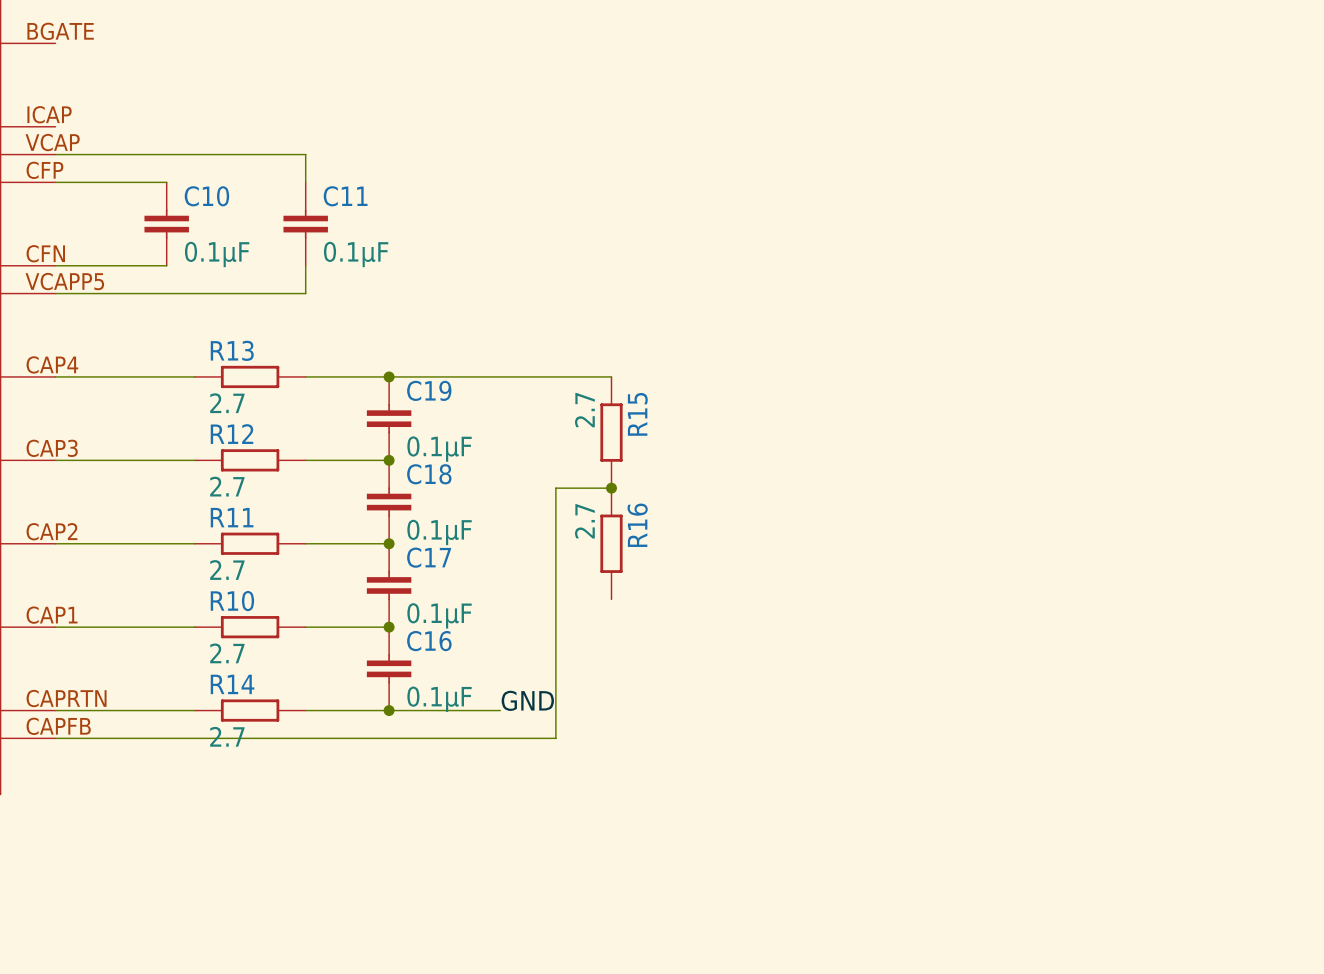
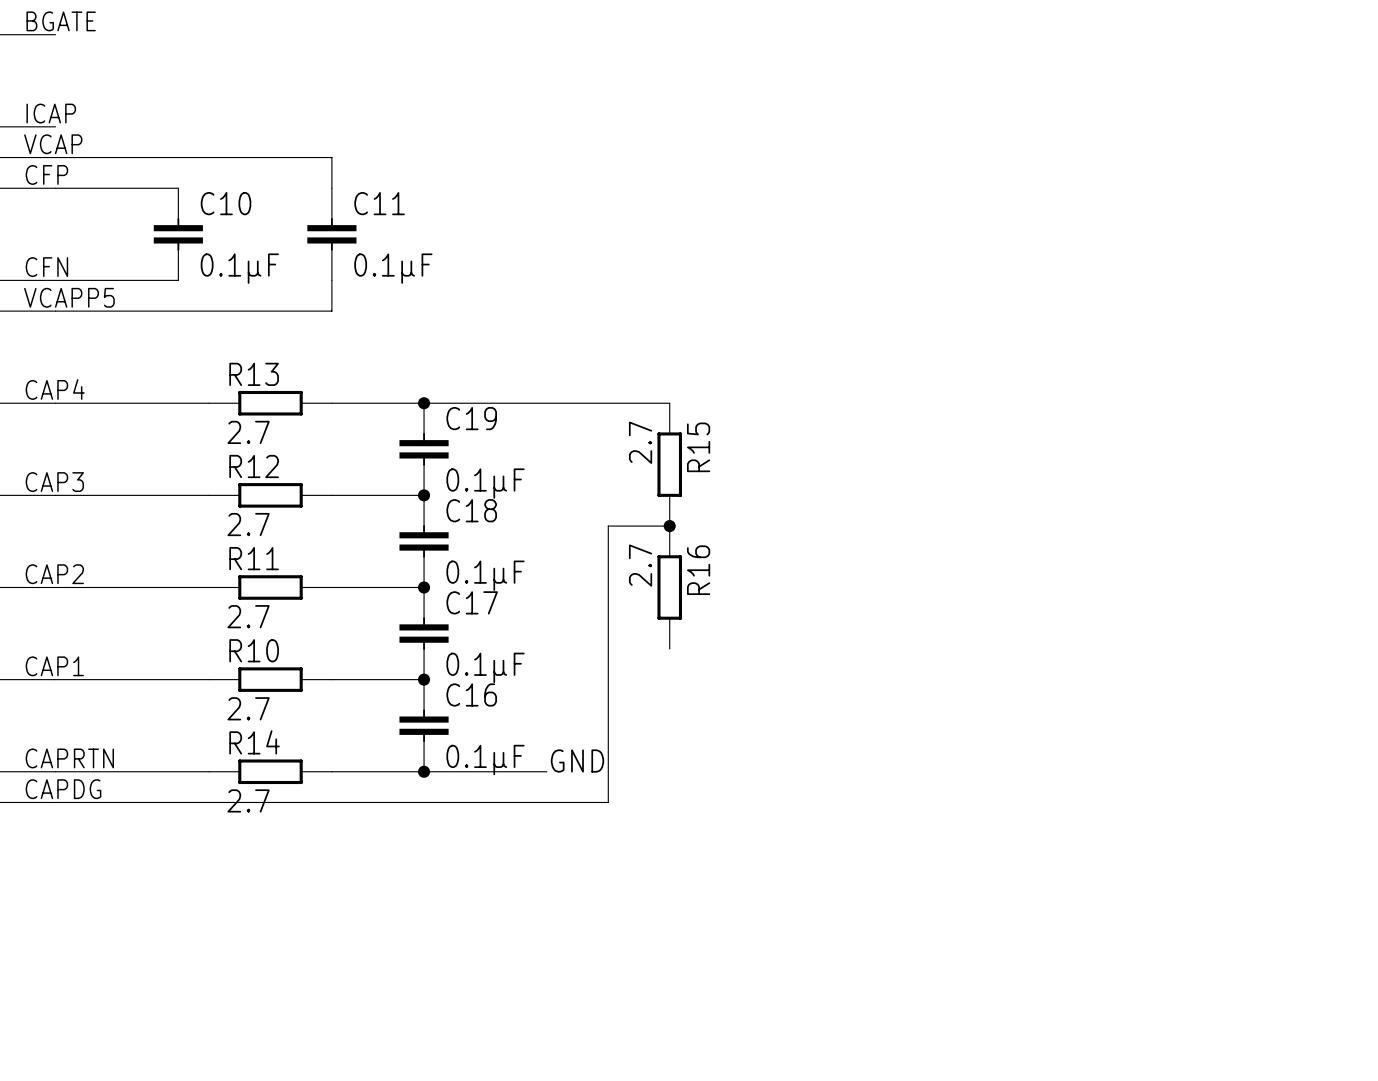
part pin number: CAPFB (58, 726) -> CAPDG (63, 789)

